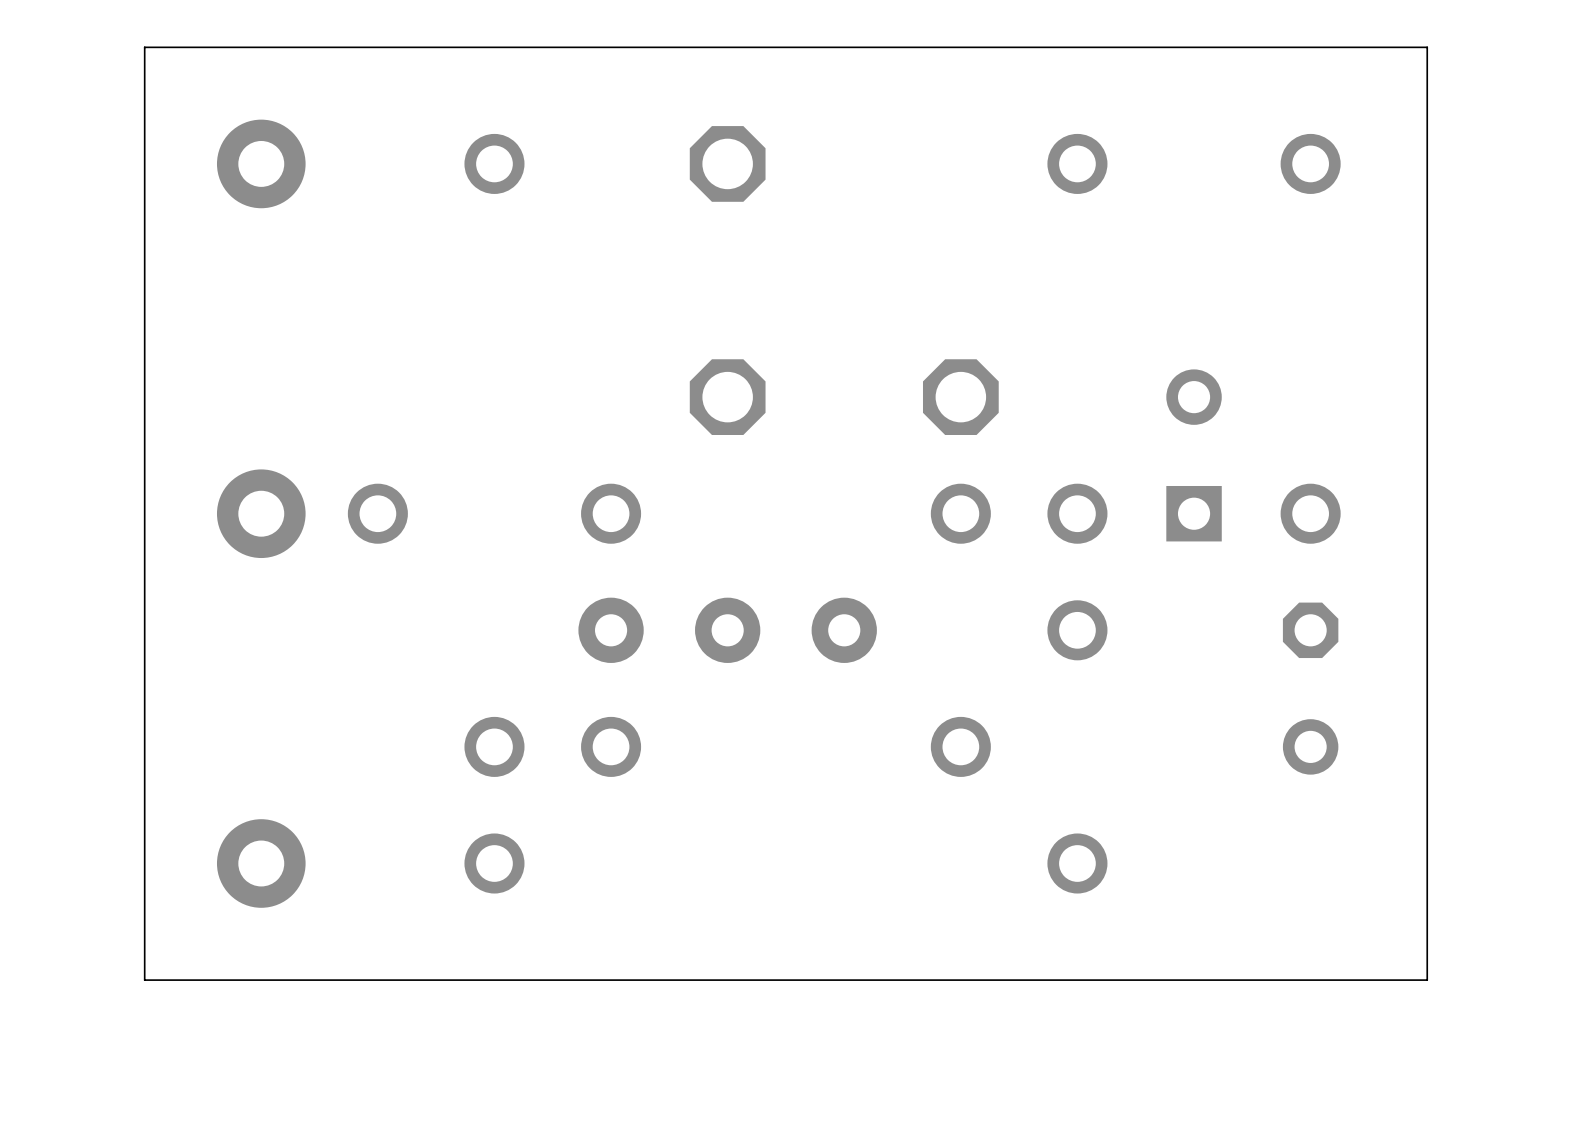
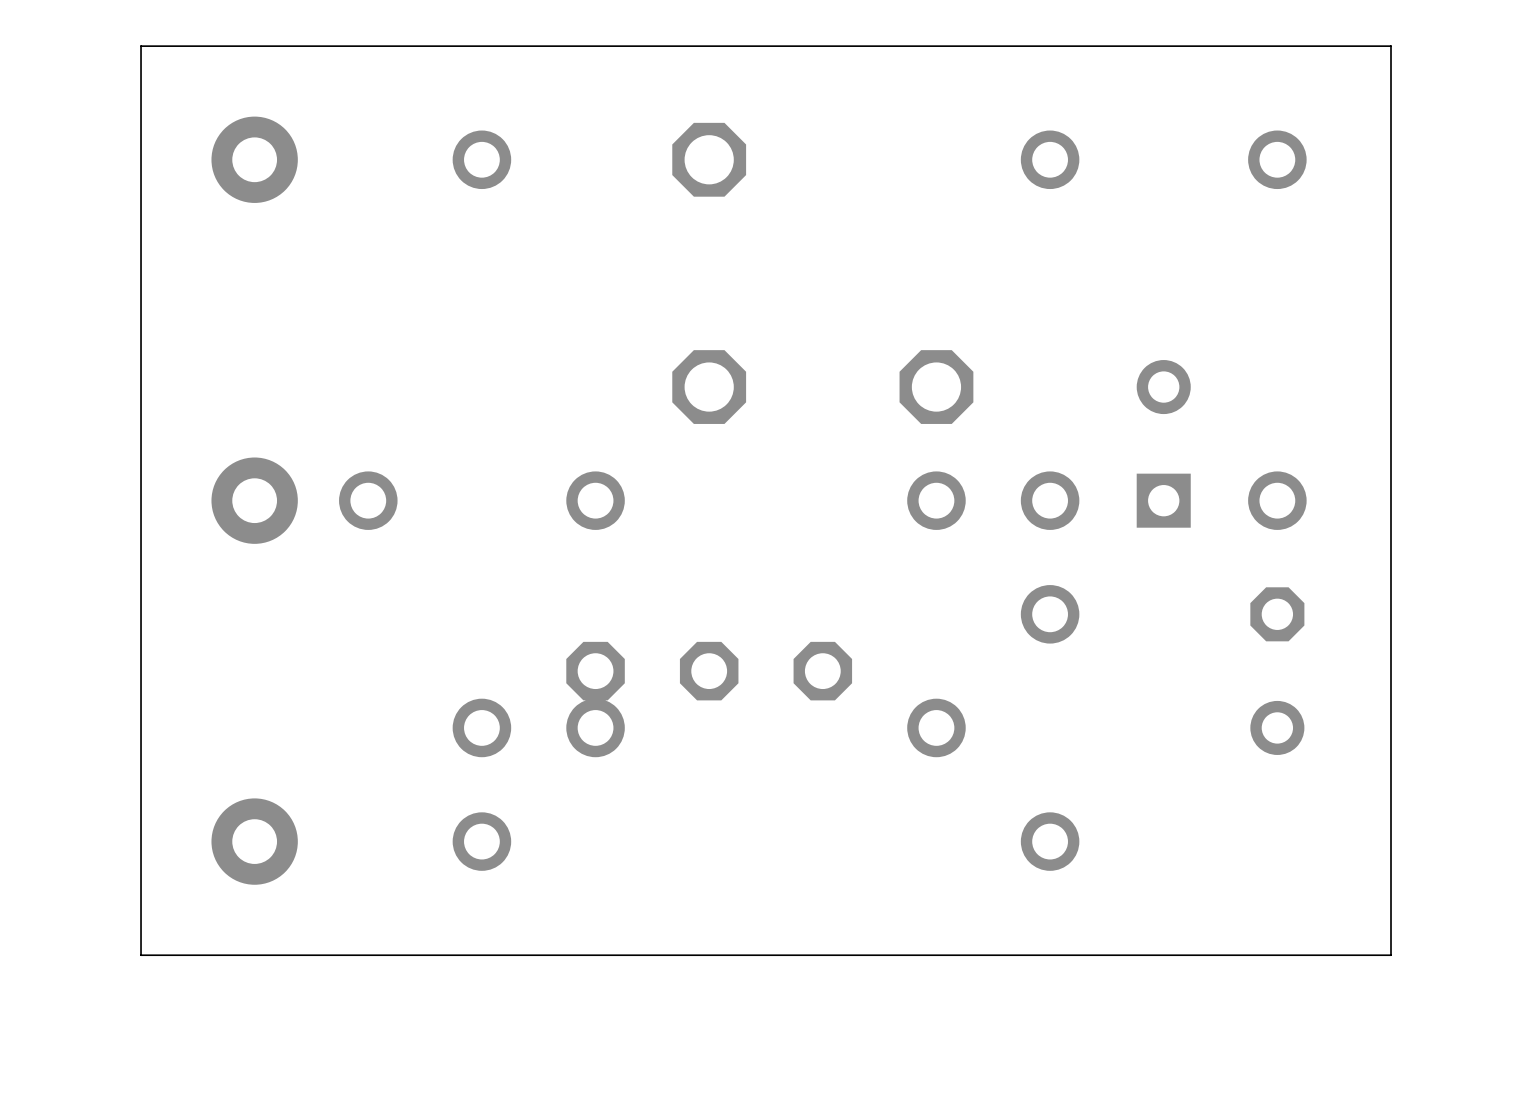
part: (727, 630) -> none
part: none -> (709, 671)

